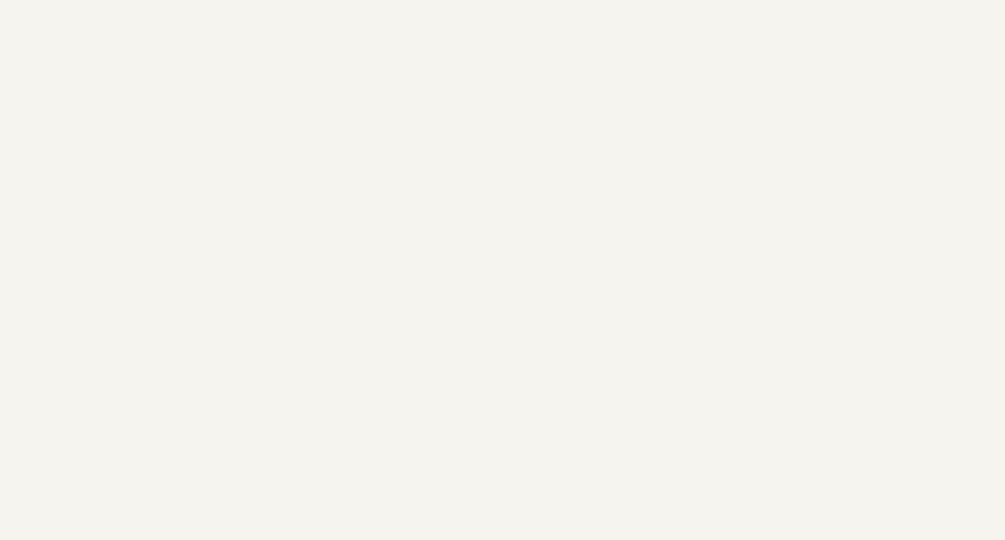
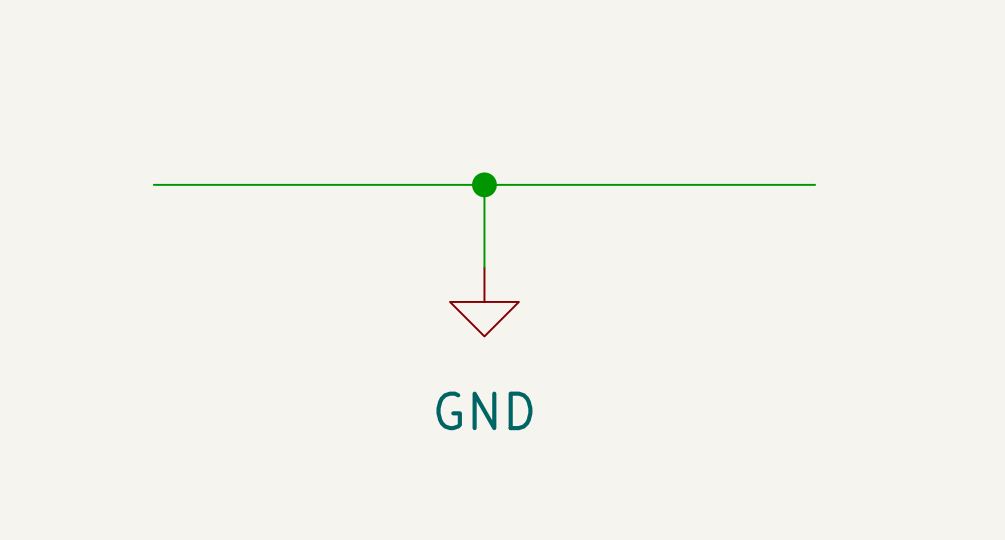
wire: none -> (153, 184) (815, 184)
wire: none -> (484, 184) (484, 267)
junction: none -> (484, 184)
power symbol: none -> GND (484, 301)

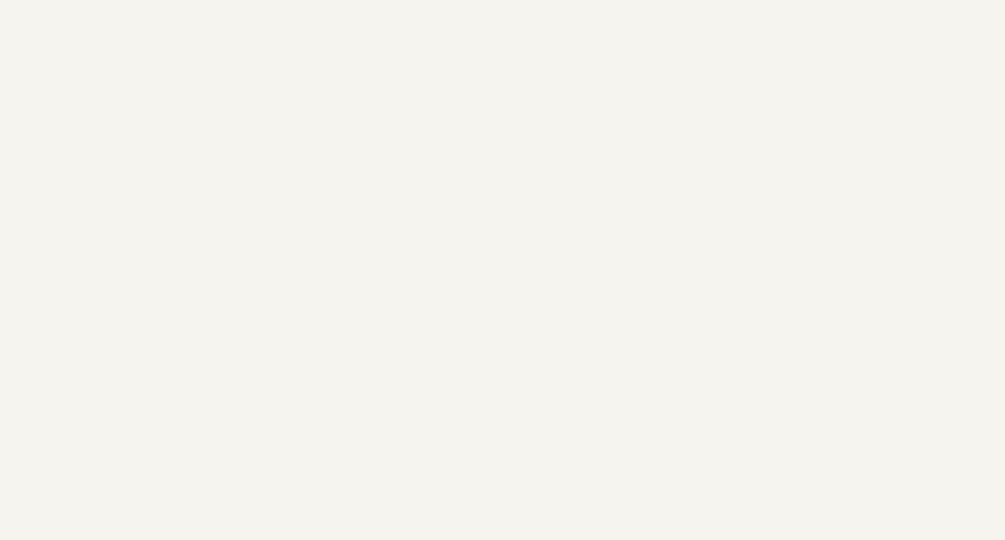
wire: (153, 184) (815, 184) -> none
wire: (484, 184) (484, 267) -> none
junction: (484, 184) -> none
power symbol: GND (484, 301) -> none

